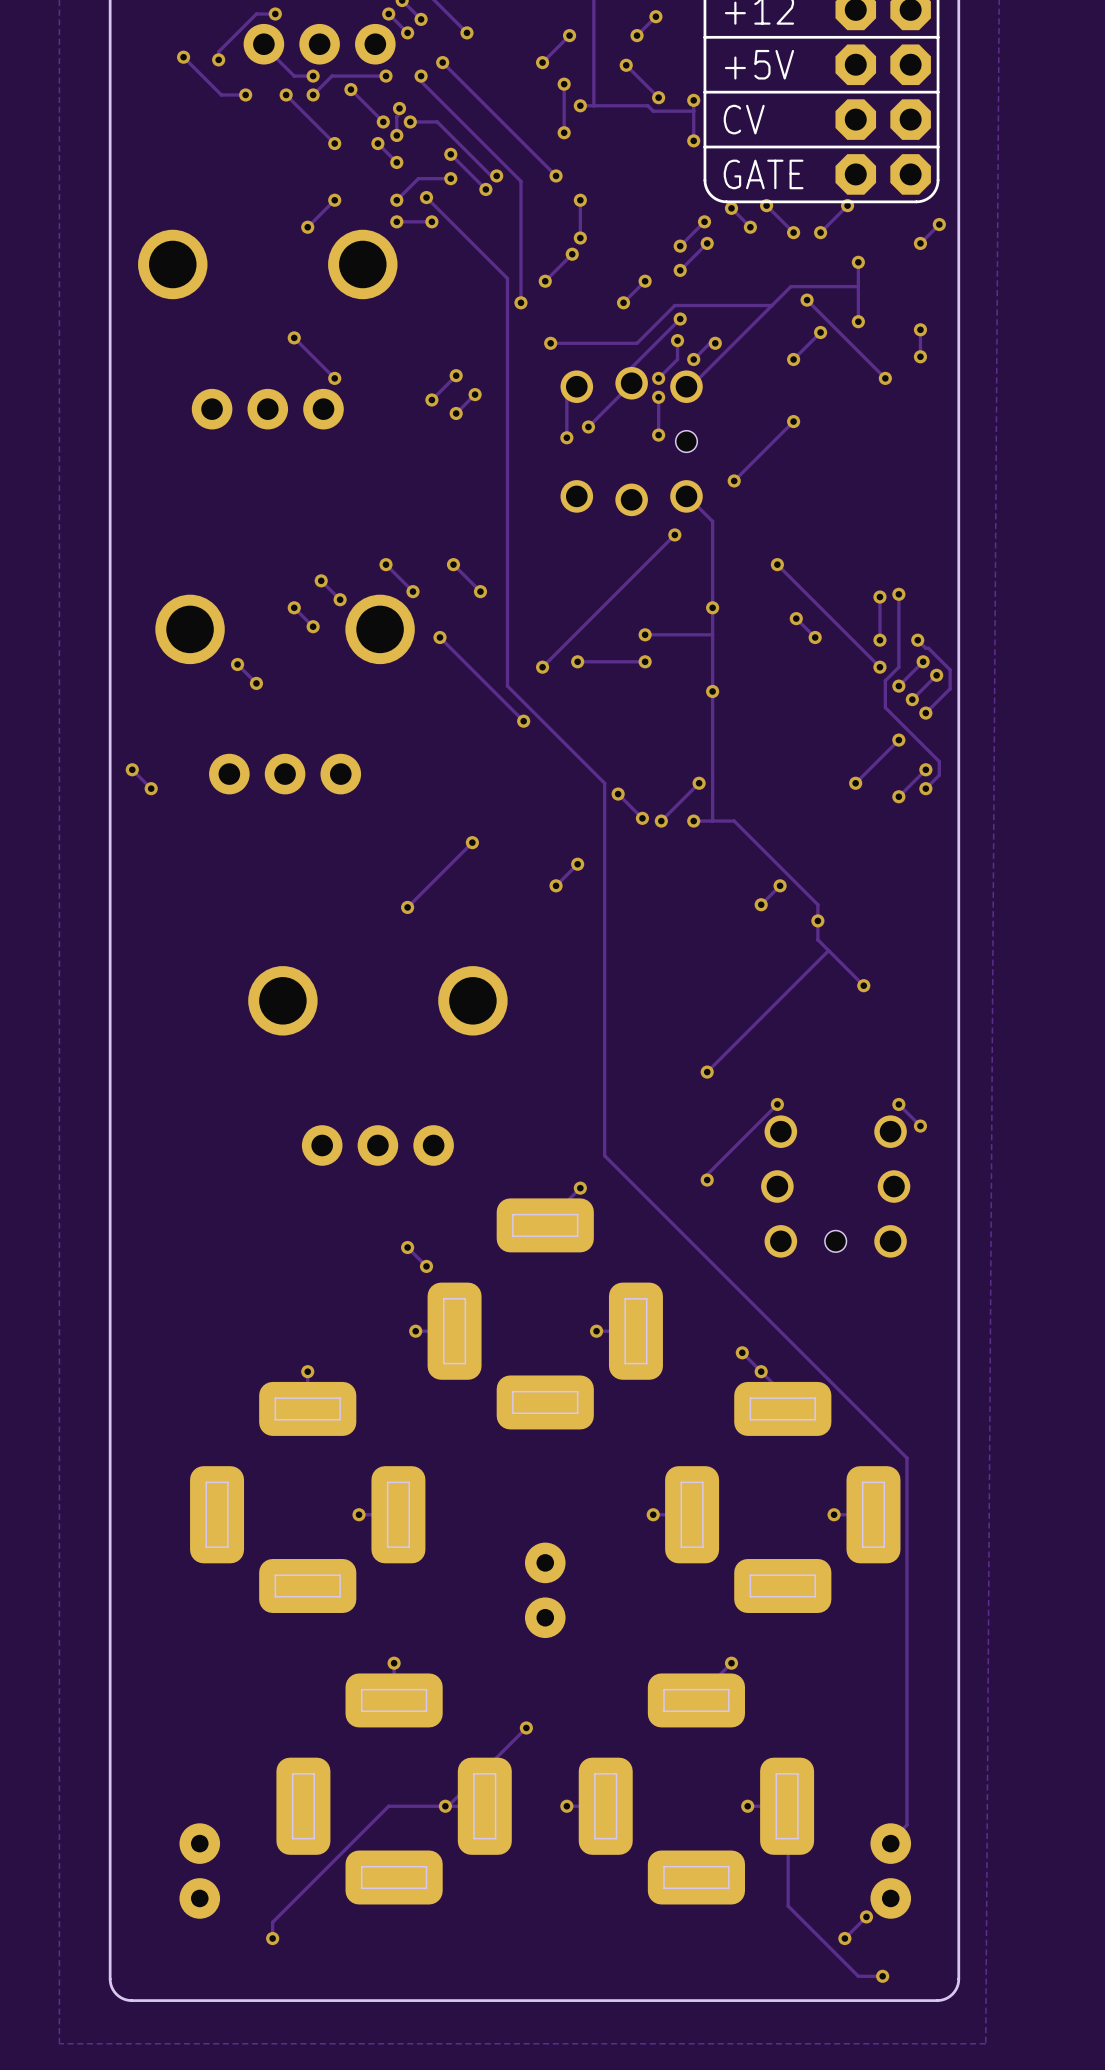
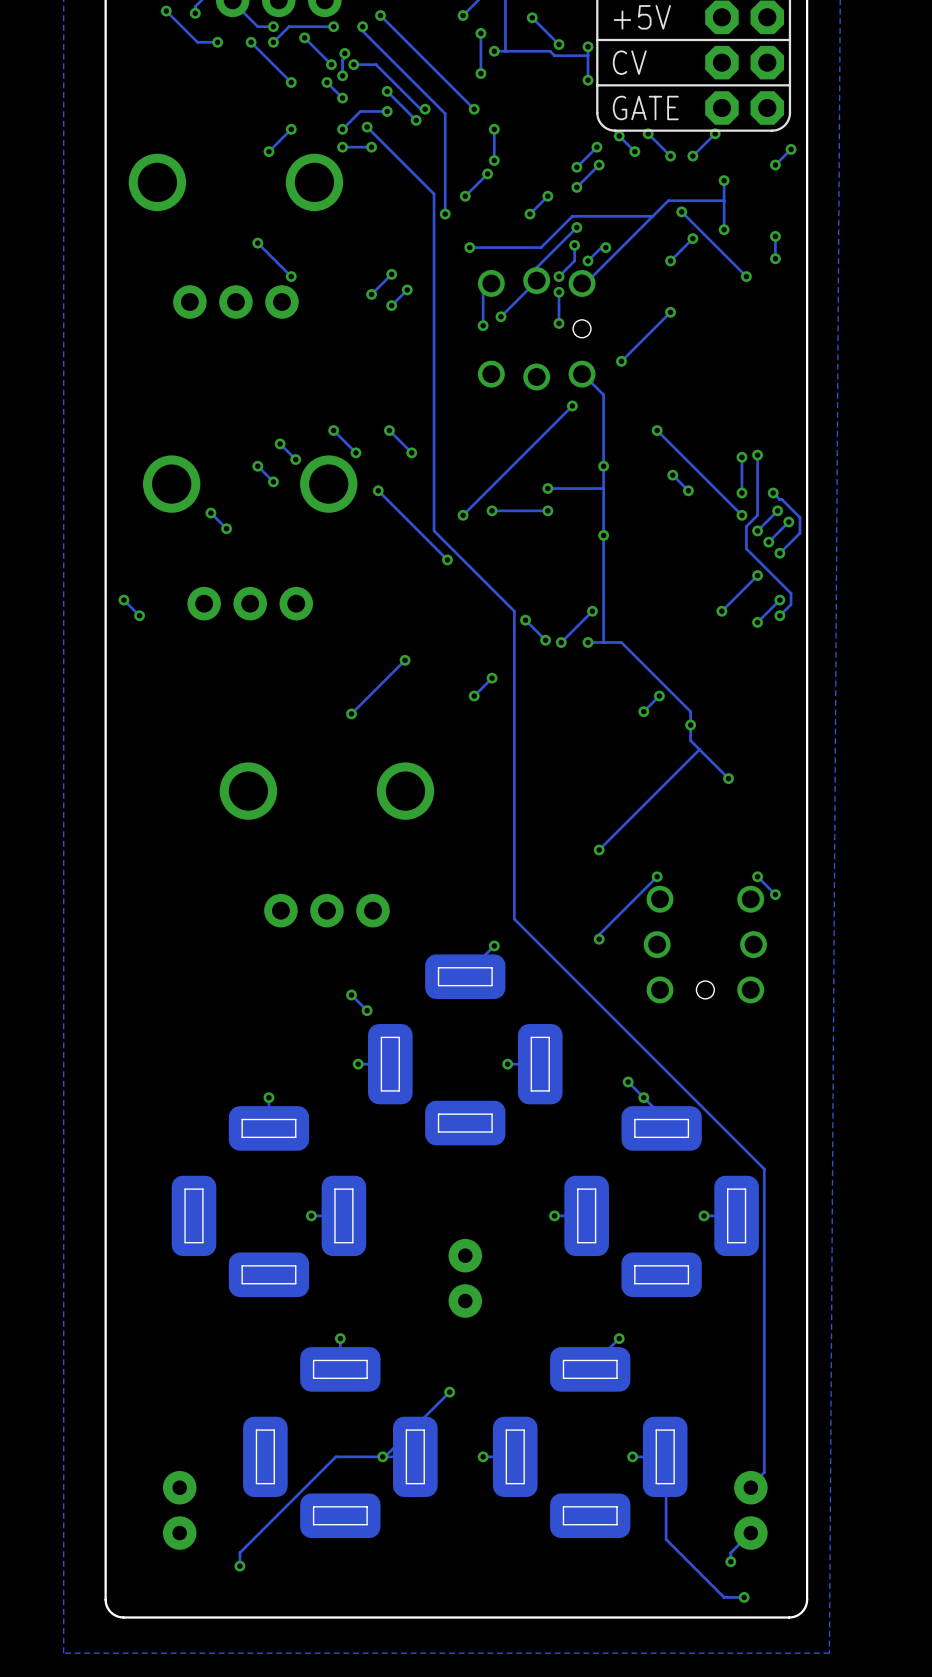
track: none -> (750, 1532) (730, 1552) (730, 1561)
track: (866, 1916) (844, 1938) -> none
via: (866, 1916) -> none
via: none -> (730, 1561)
via: (844, 1938) -> none

